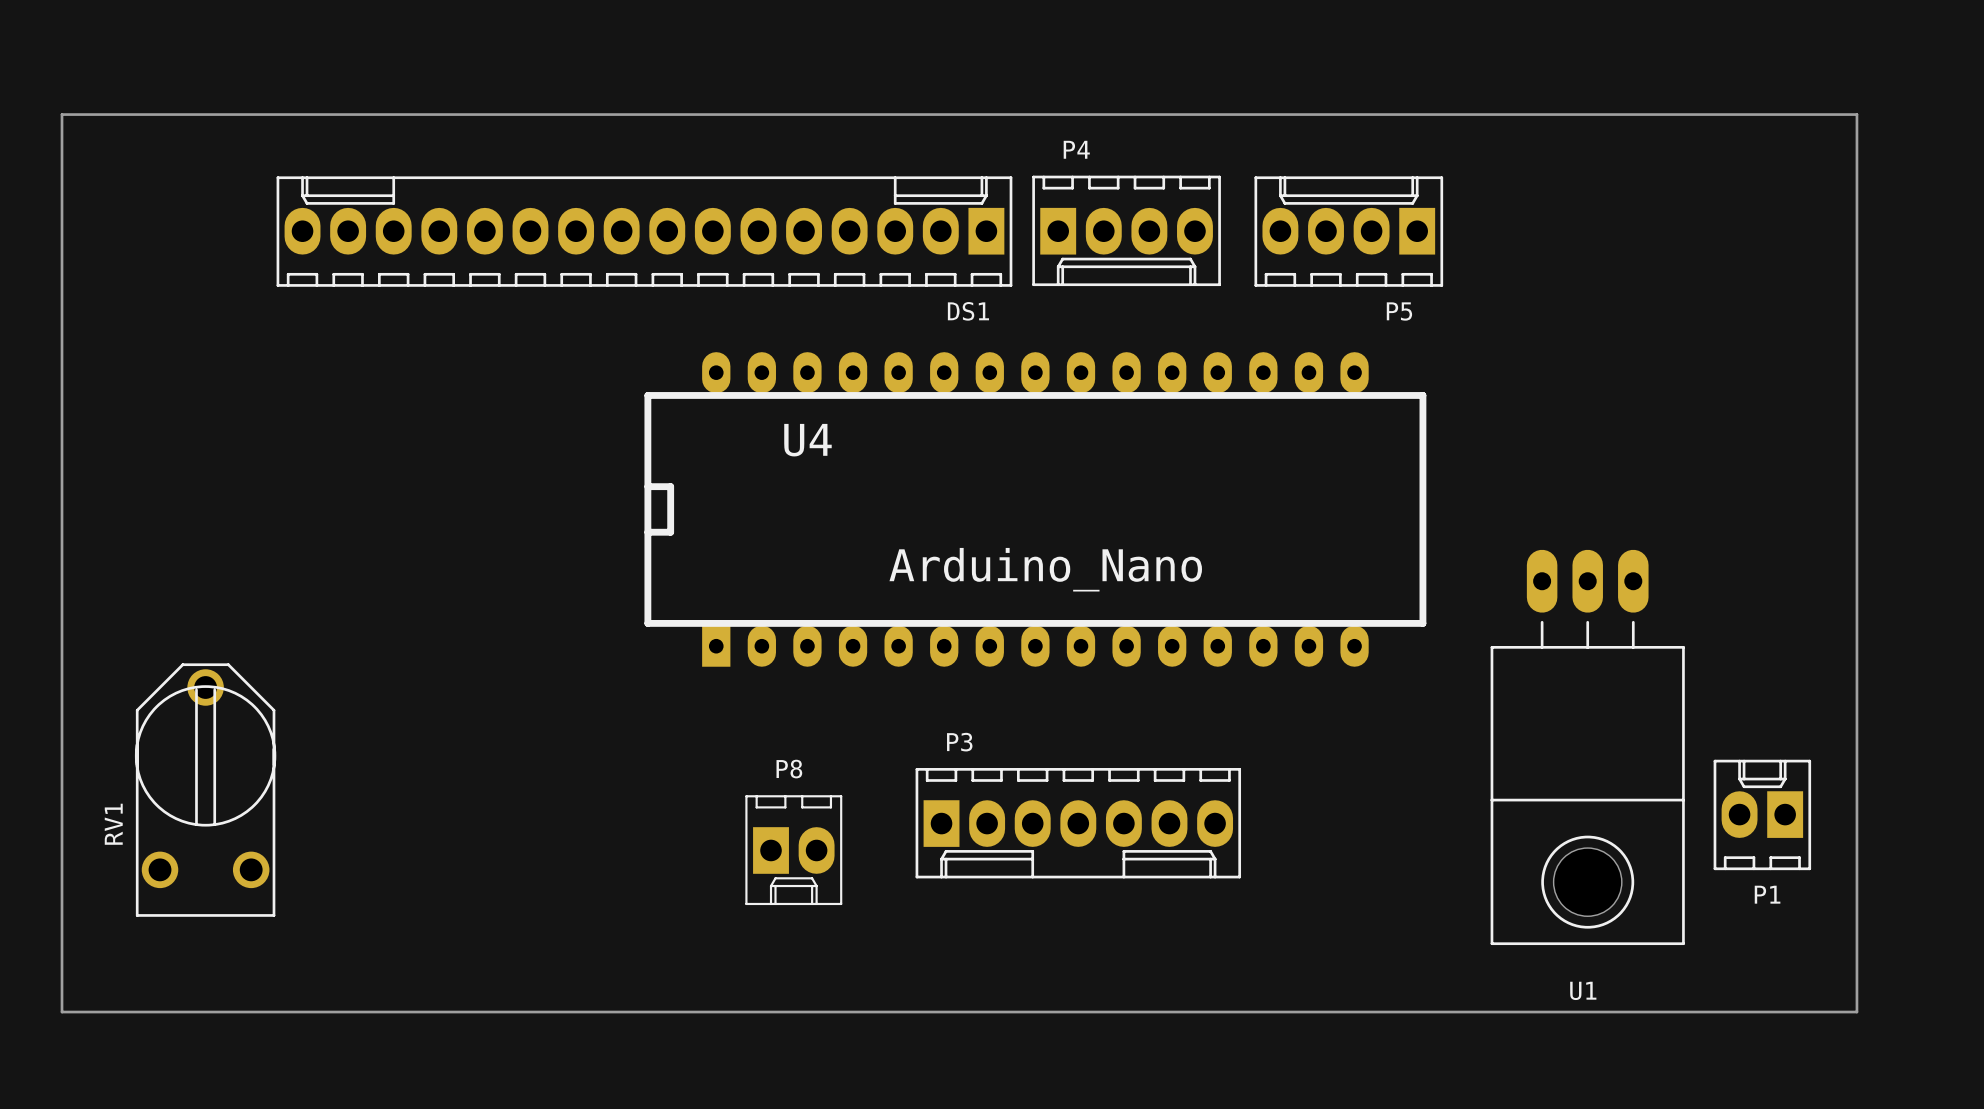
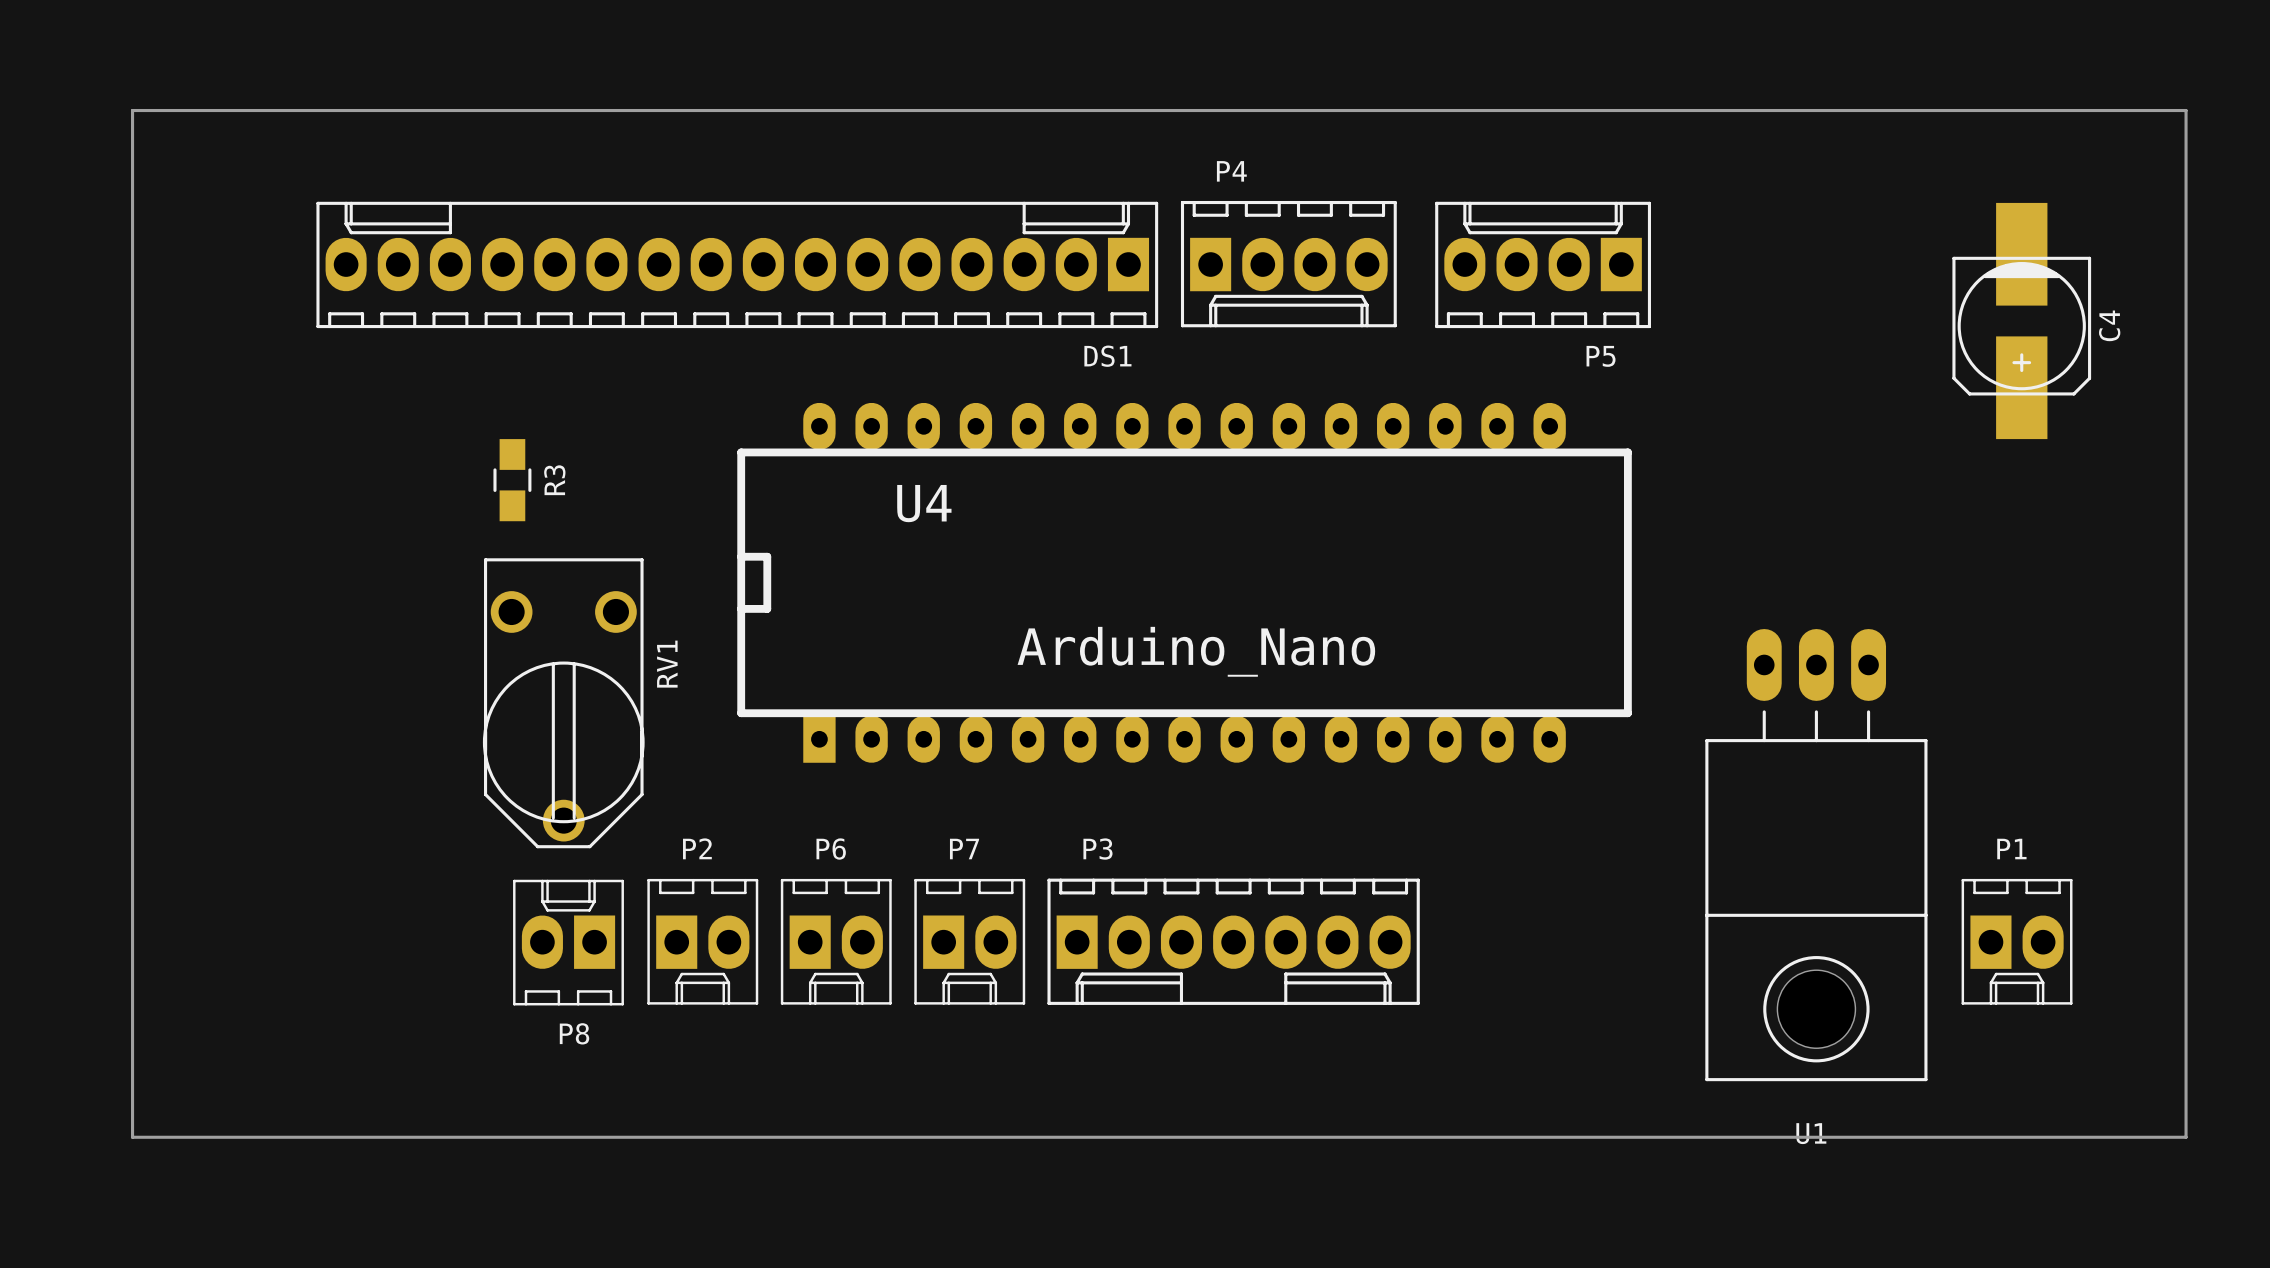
board edge: (62, 114) (62, 1012) (1856, 1012) (1856, 114) (62, 114) -> (132, 110) (132, 1137) (2186, 1137) (2186, 110) (132, 110)
C4: none -> (2021, 321)
R3: none -> (512, 480)
P1 footprint: [1713, 759, 1812, 871] -> [1961, 878, 2073, 1005]
RV1 rotation: 0° (205, 790) -> 180° (563, 703)
RV1 position: (205, 790) -> (563, 703)
P2: none -> (702, 941)
P6: none -> (836, 941)
P7: none -> (969, 941)
P8 rotation: 0° (793, 850) -> 180° (568, 942)
P8 position: (793, 850) -> (568, 942)
P1 name position: P1 (1767, 894) -> P1 (2011, 849)

